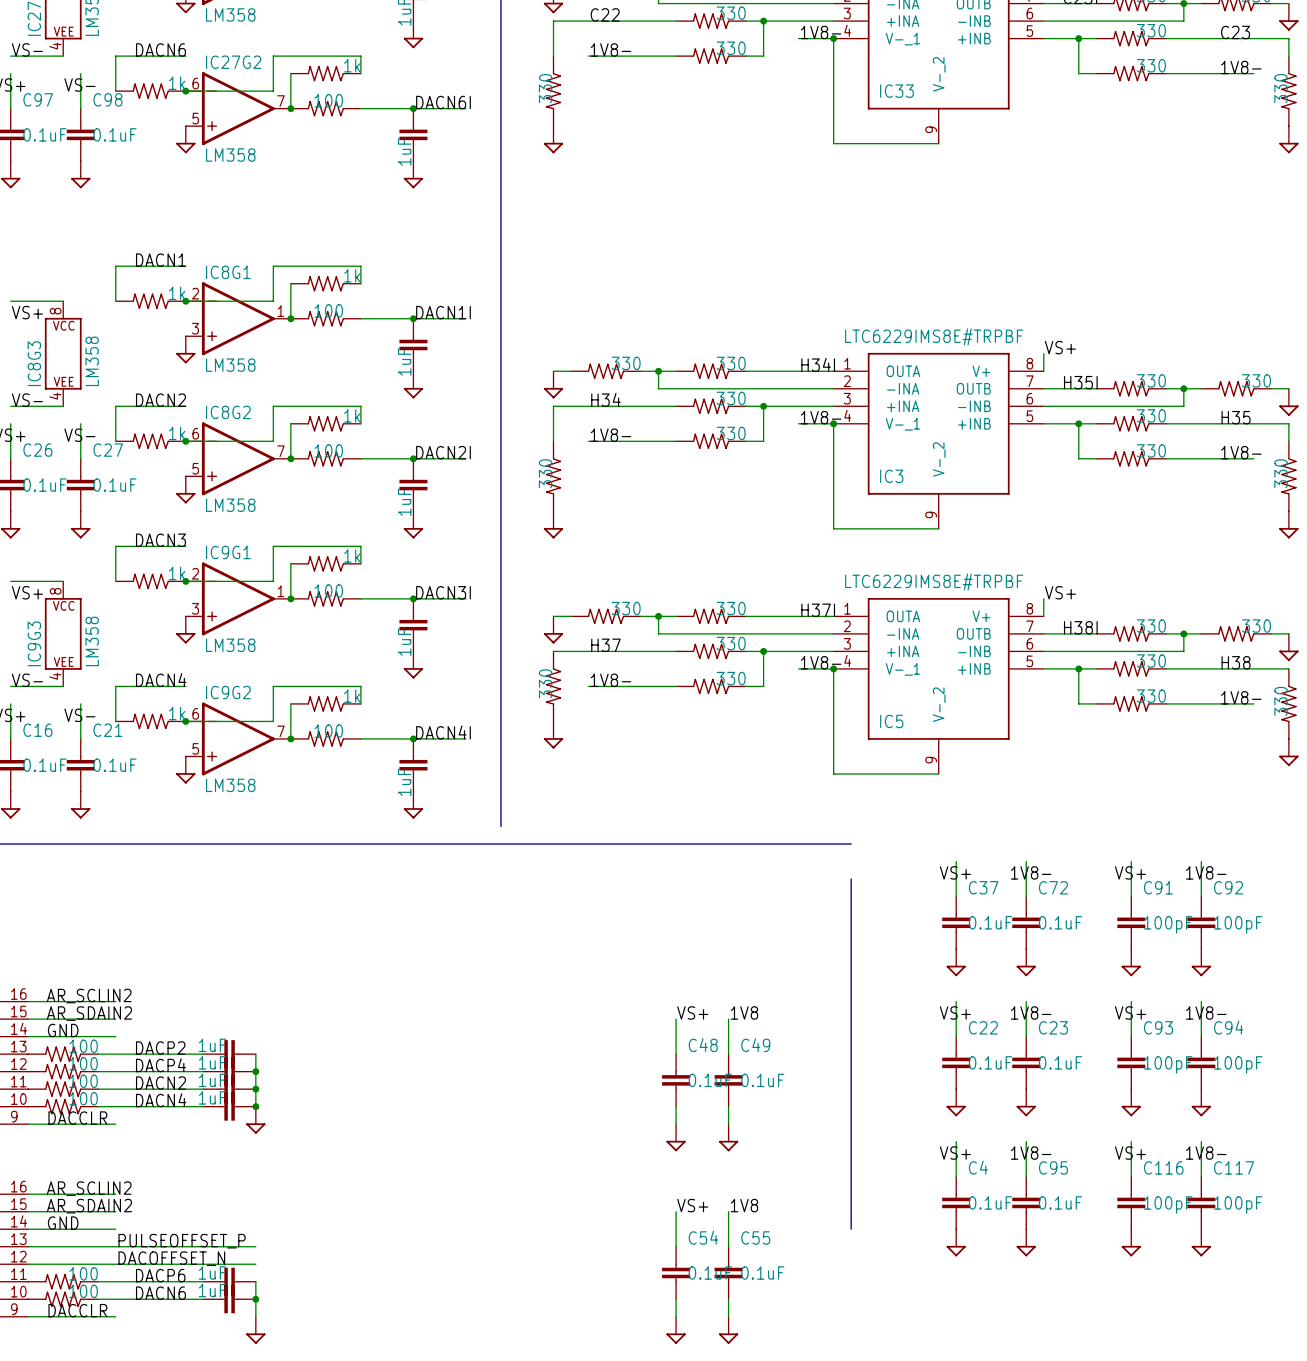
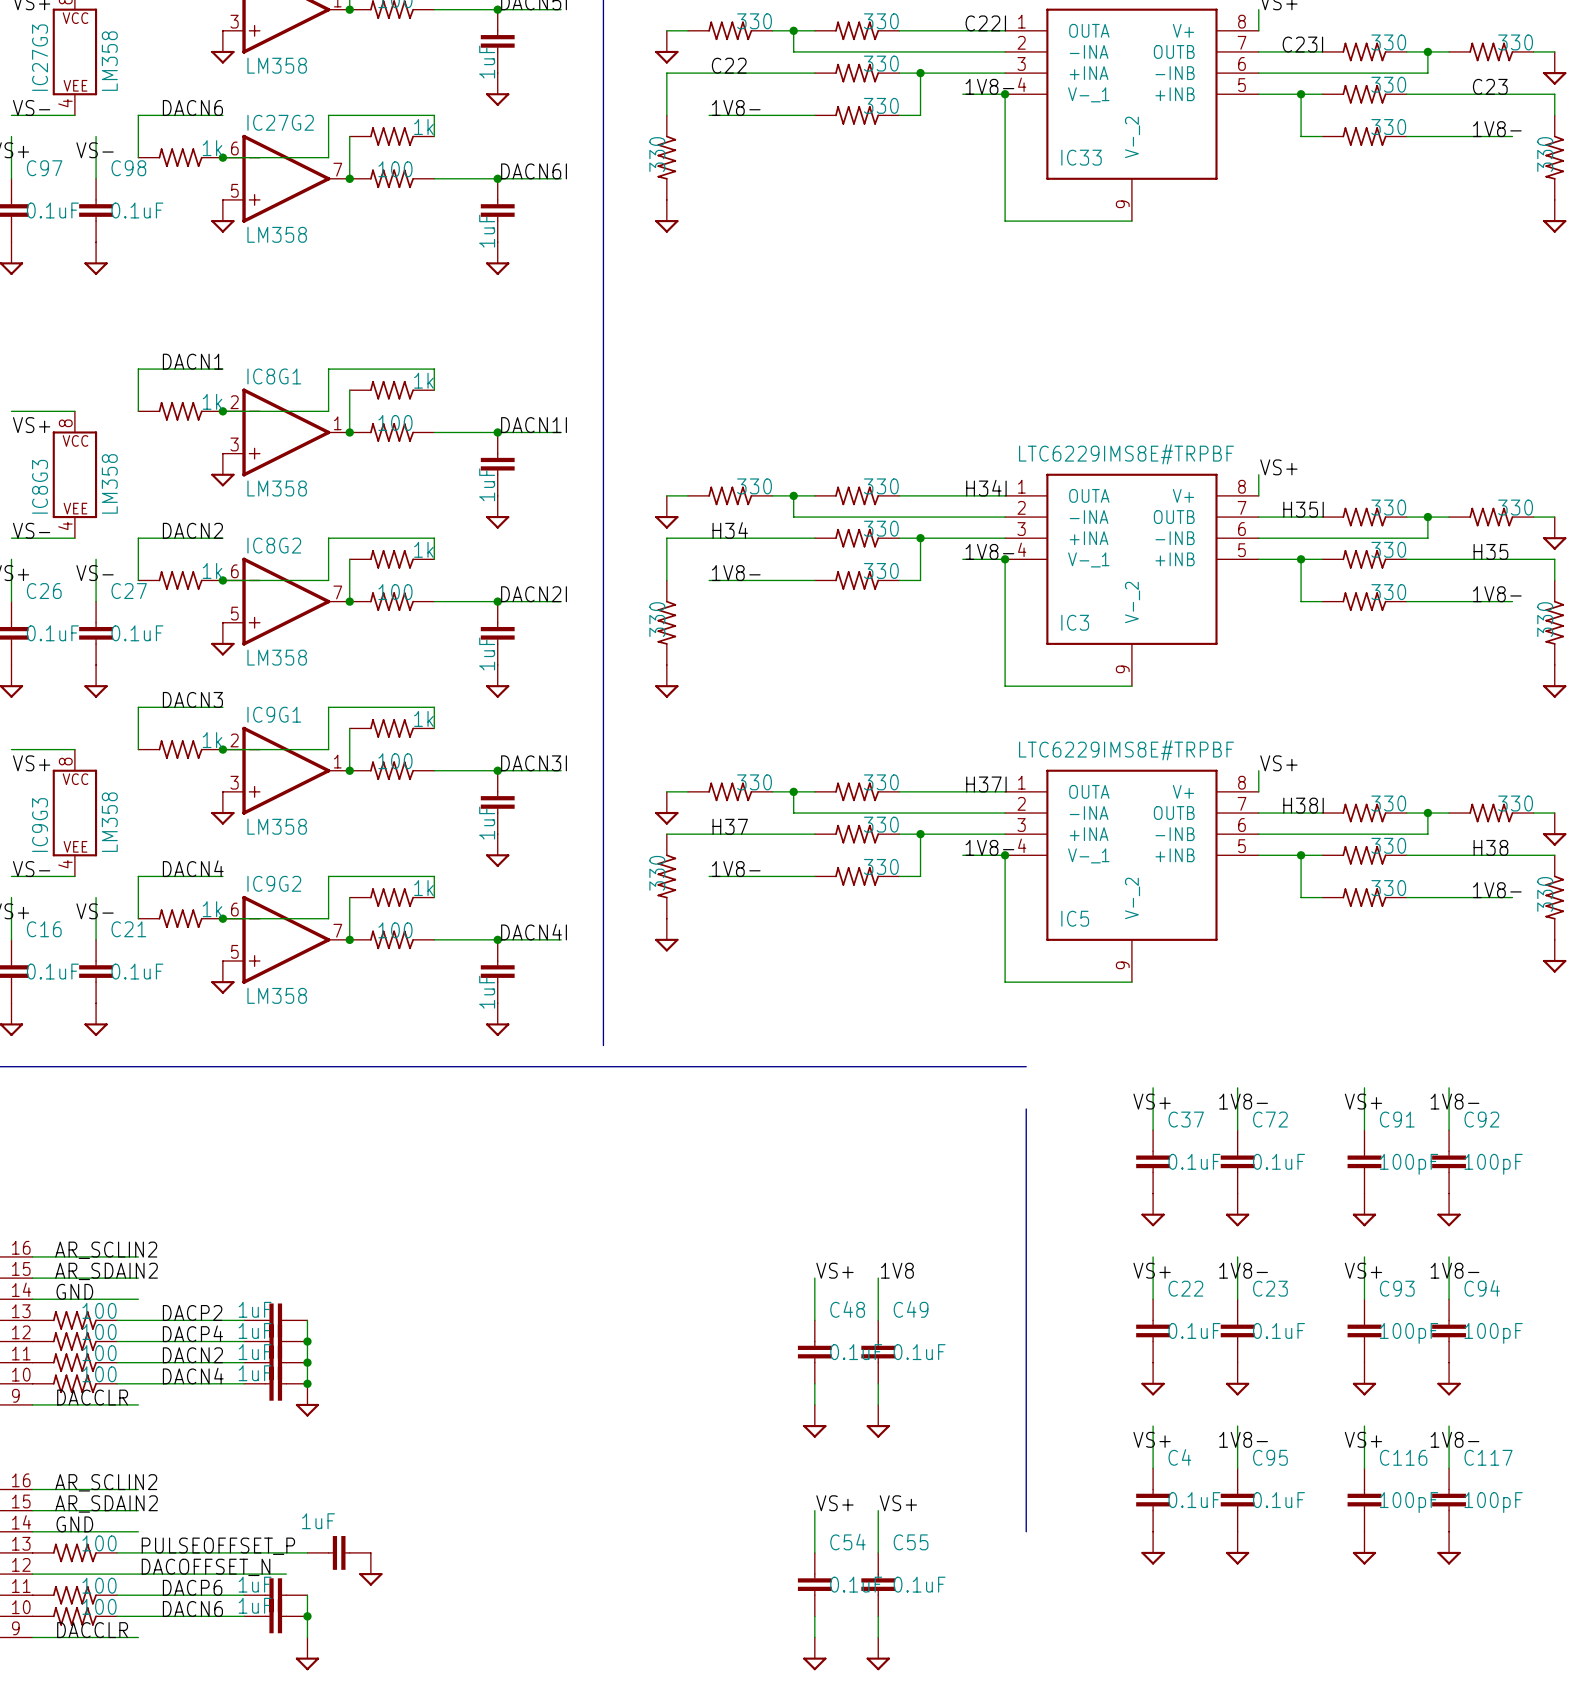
label: 1V8 (744, 1205) -> VS+ (898, 1503)
part: none -> 100 (74, 1552)
part: none -> 1uF (339, 1552)
power symbol: none -> (370, 1569)
wire: (238, 1264) (255, 1264) -> none

